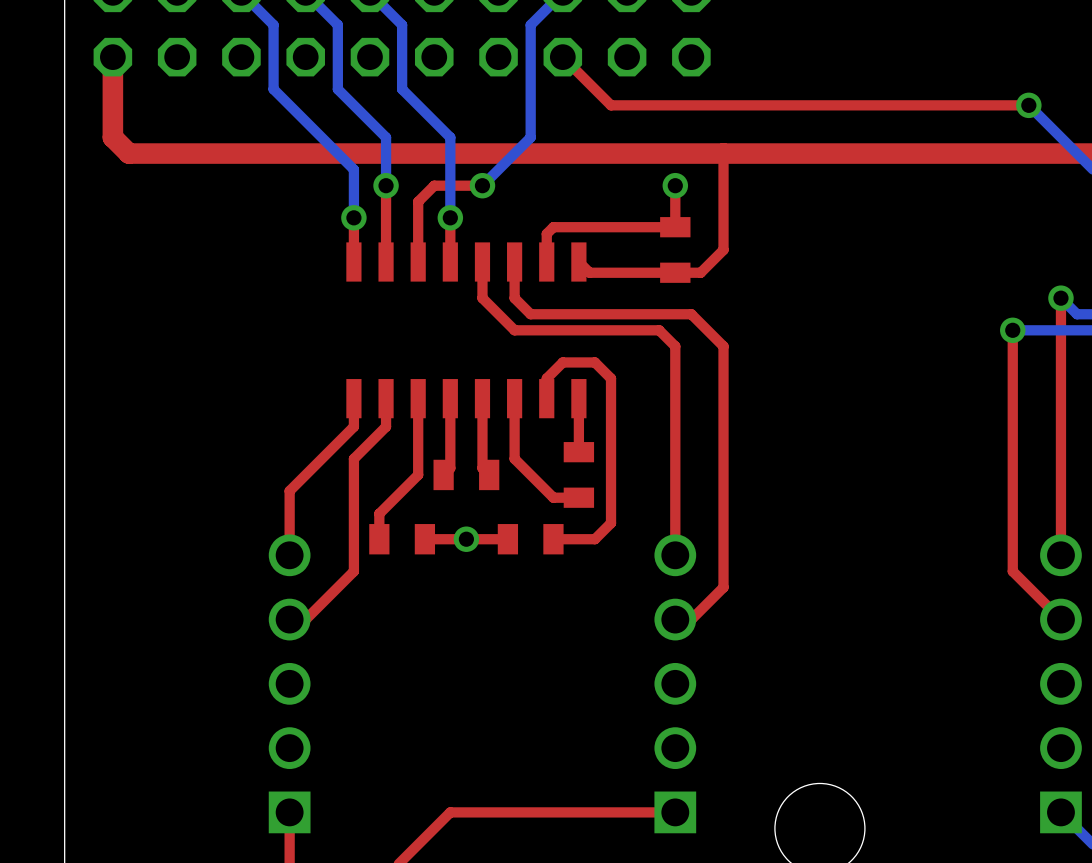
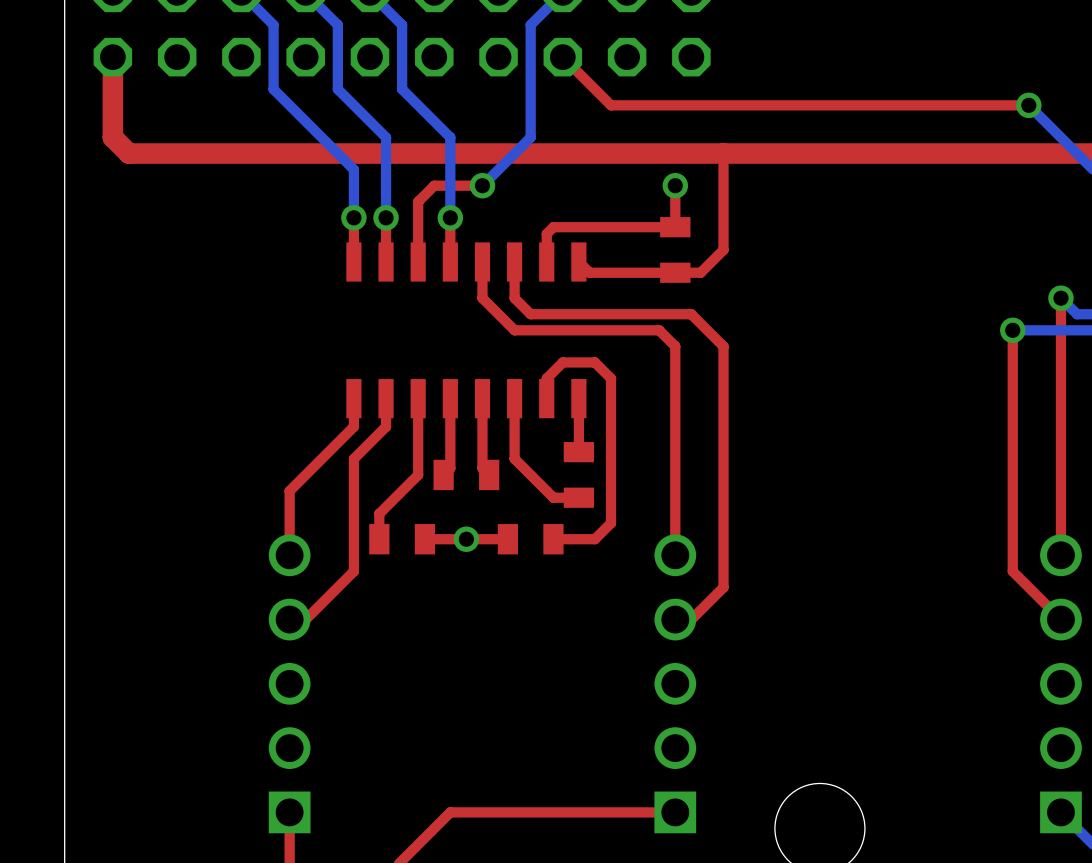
top track: (386, 185) (386, 217) -> none
bottom track: none -> (386, 185) (386, 217)
via position: (386, 185) -> (386, 217)

